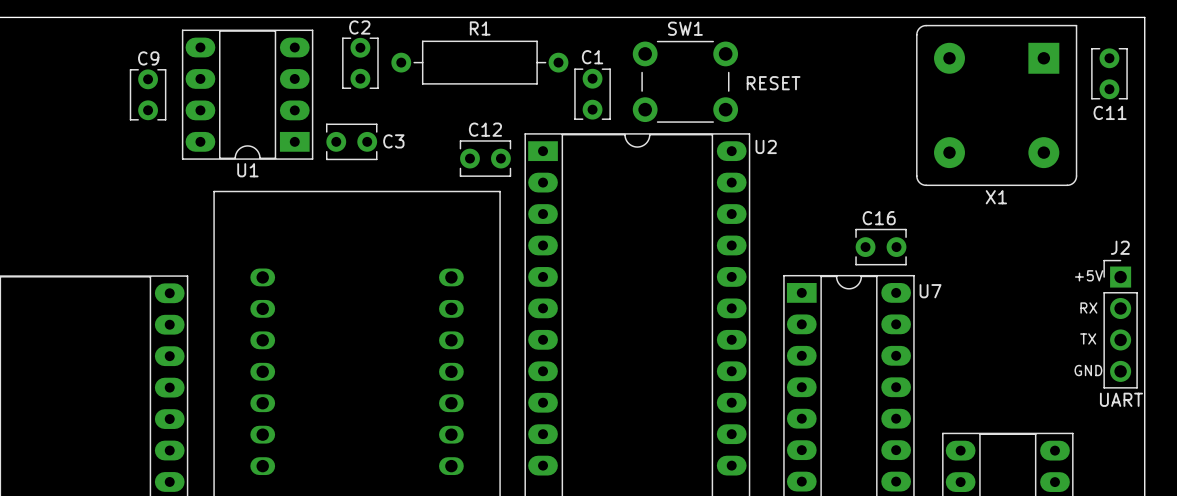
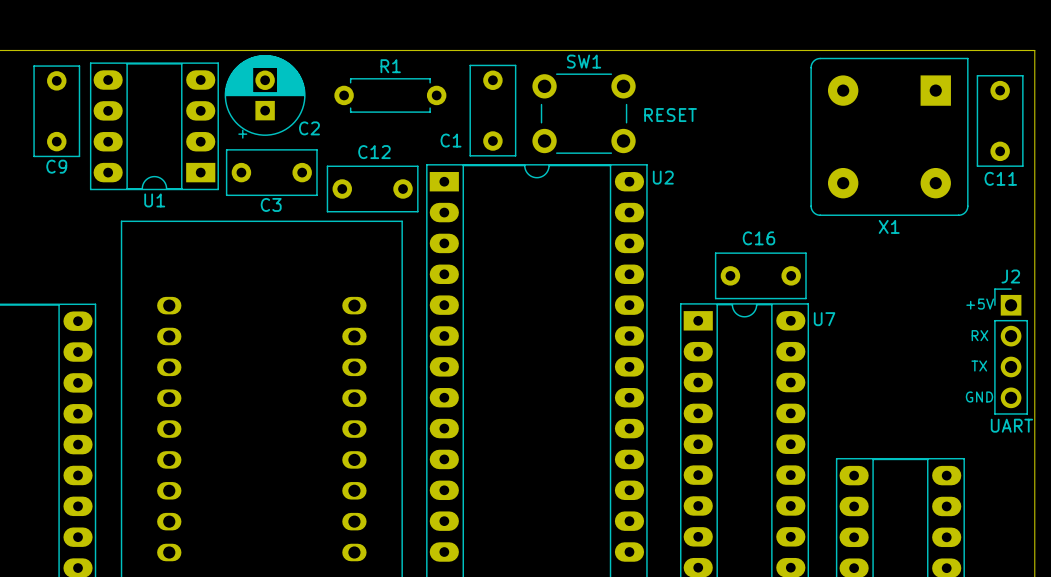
C2 name position: C2 (359, 27) -> C2 (309, 128)
C2 footprint: [342, 37, 379, 89] -> [224, 54, 306, 139]
R1 footprint: [391, 40, 569, 85] -> [334, 78, 447, 113]
C11 footprint: [1091, 48, 1128, 100] -> [976, 75, 1024, 167]
C1 name position: C1 (592, 57) -> C1 (451, 140)
C9 name position: C9 (148, 58) -> C9 (56, 166)
C1 footprint: [574, 68, 611, 120] -> [469, 64, 517, 157]
C9 footprint: [129, 69, 167, 121] -> [33, 65, 81, 158]
C3 footprint: [325, 123, 378, 161] -> [225, 149, 318, 197]
C12 footprint: [459, 140, 512, 177] -> [326, 165, 419, 213]
C3 name position: C3 (393, 141) -> C3 (271, 204)
C16 footprint: [855, 228, 907, 266] -> [714, 252, 807, 300]

